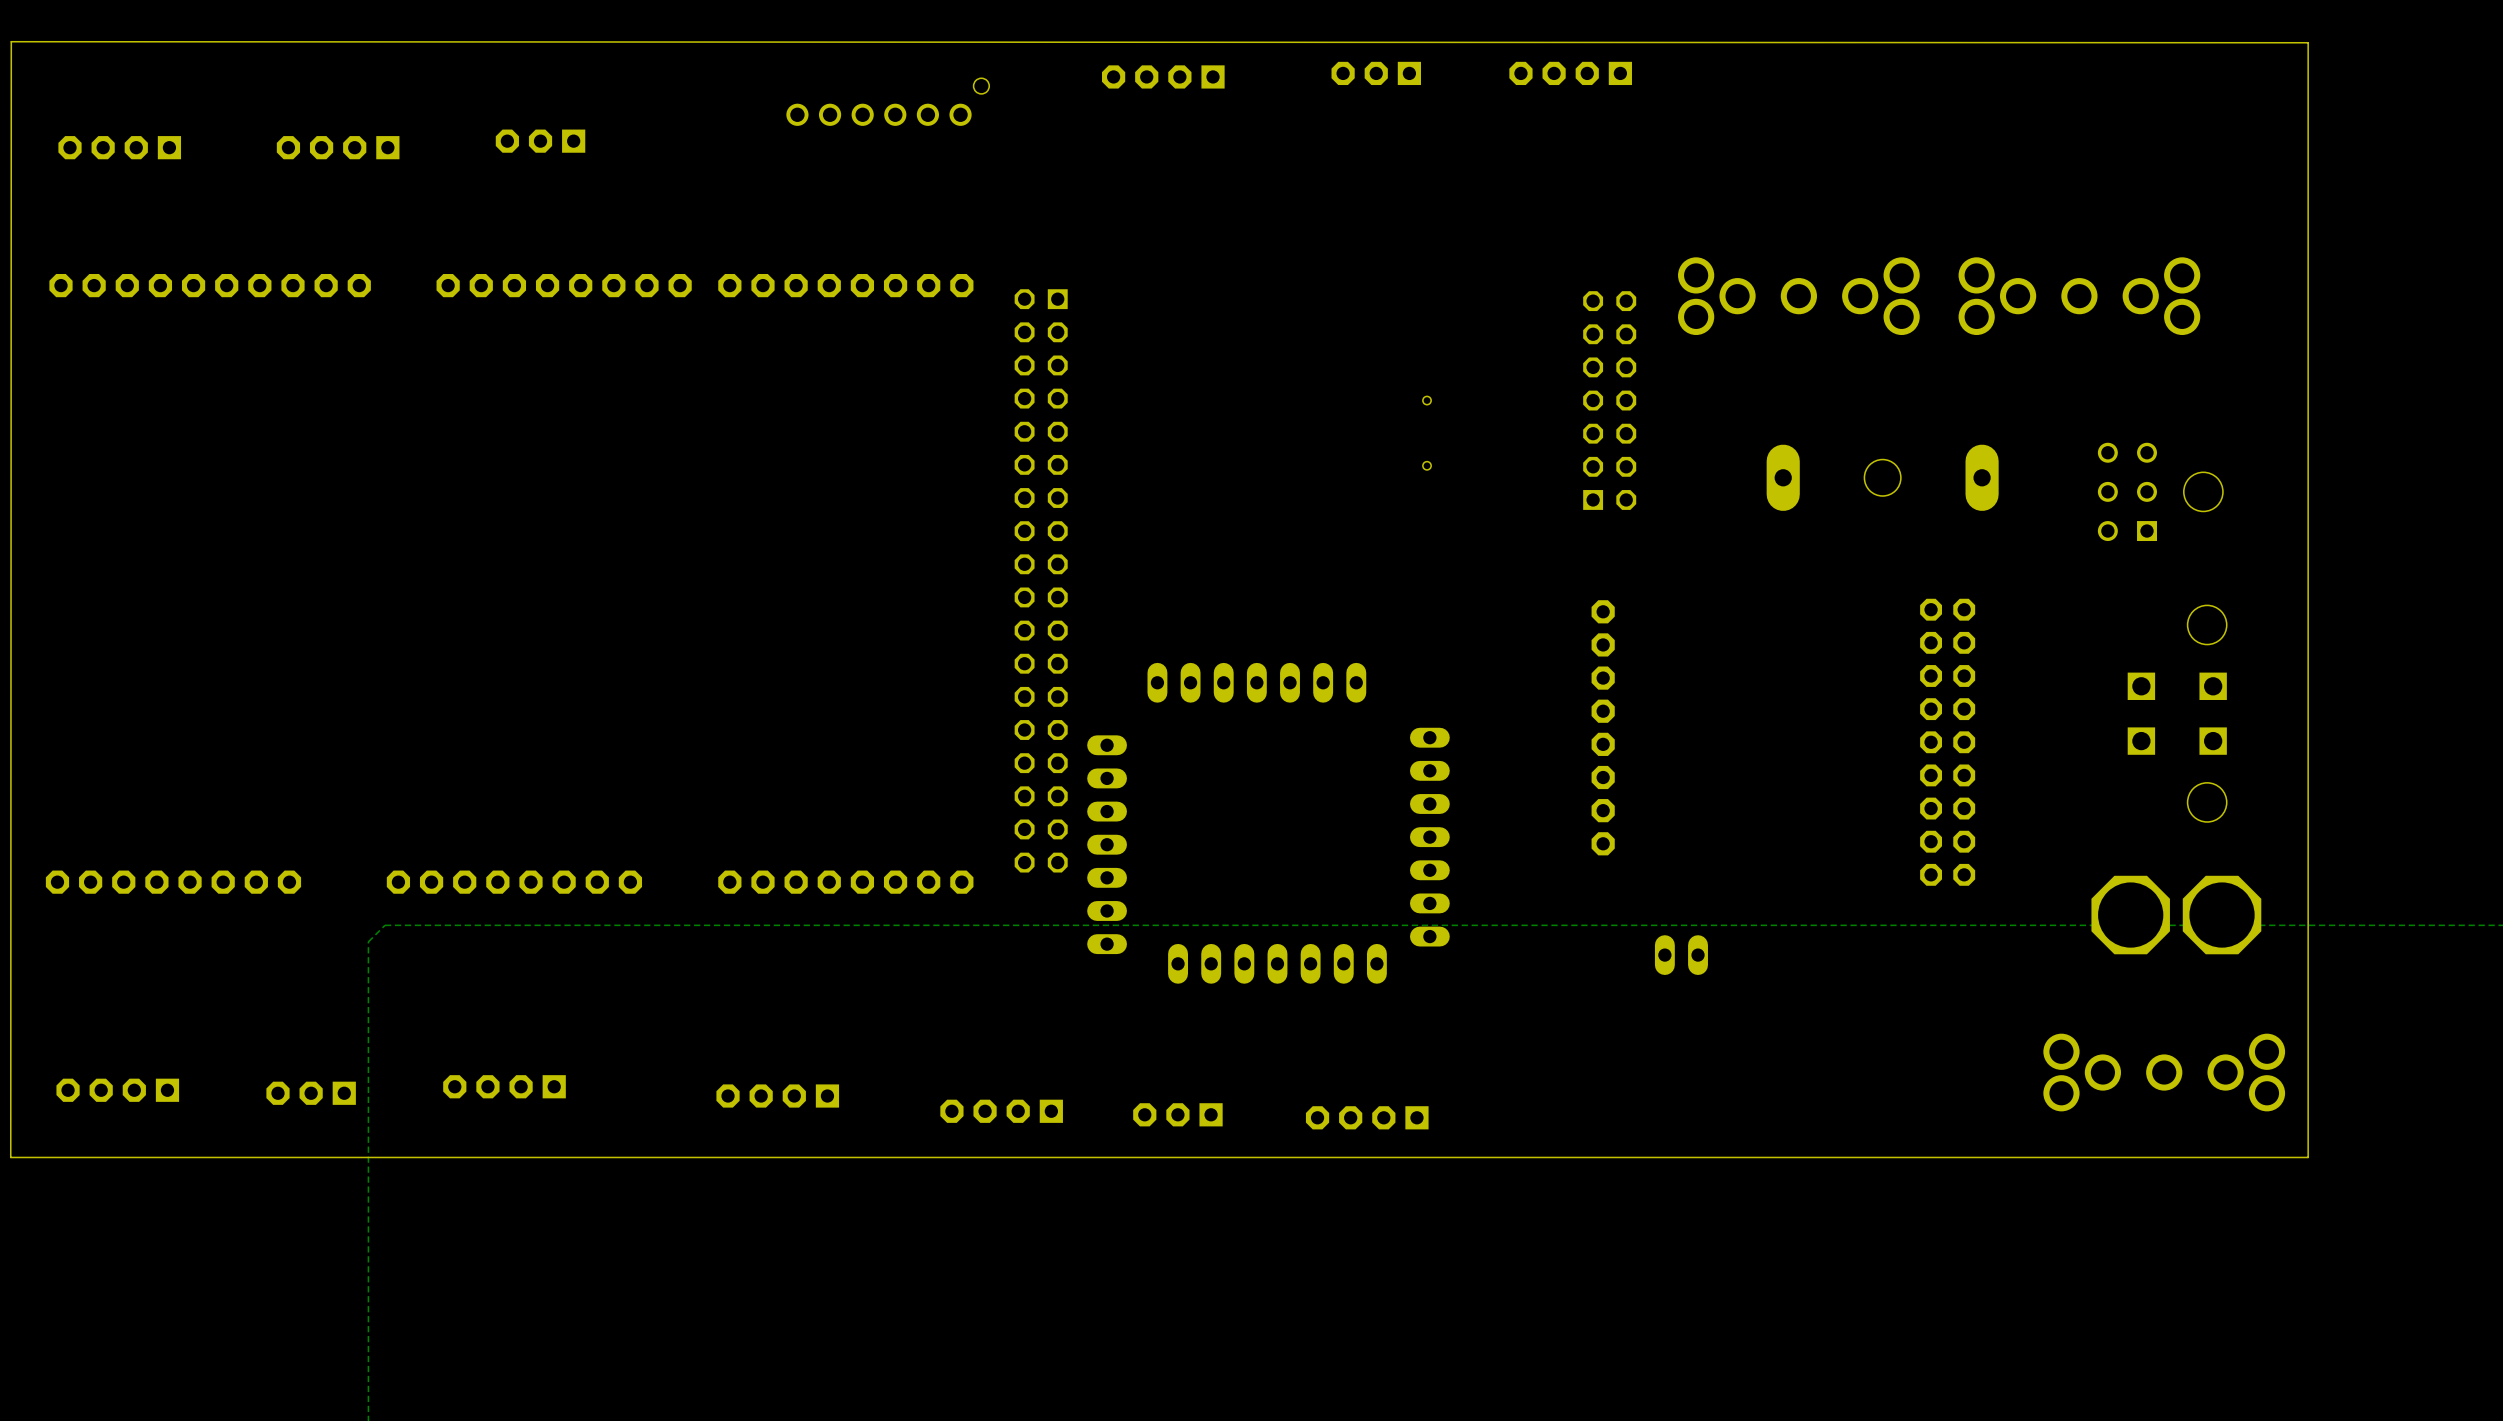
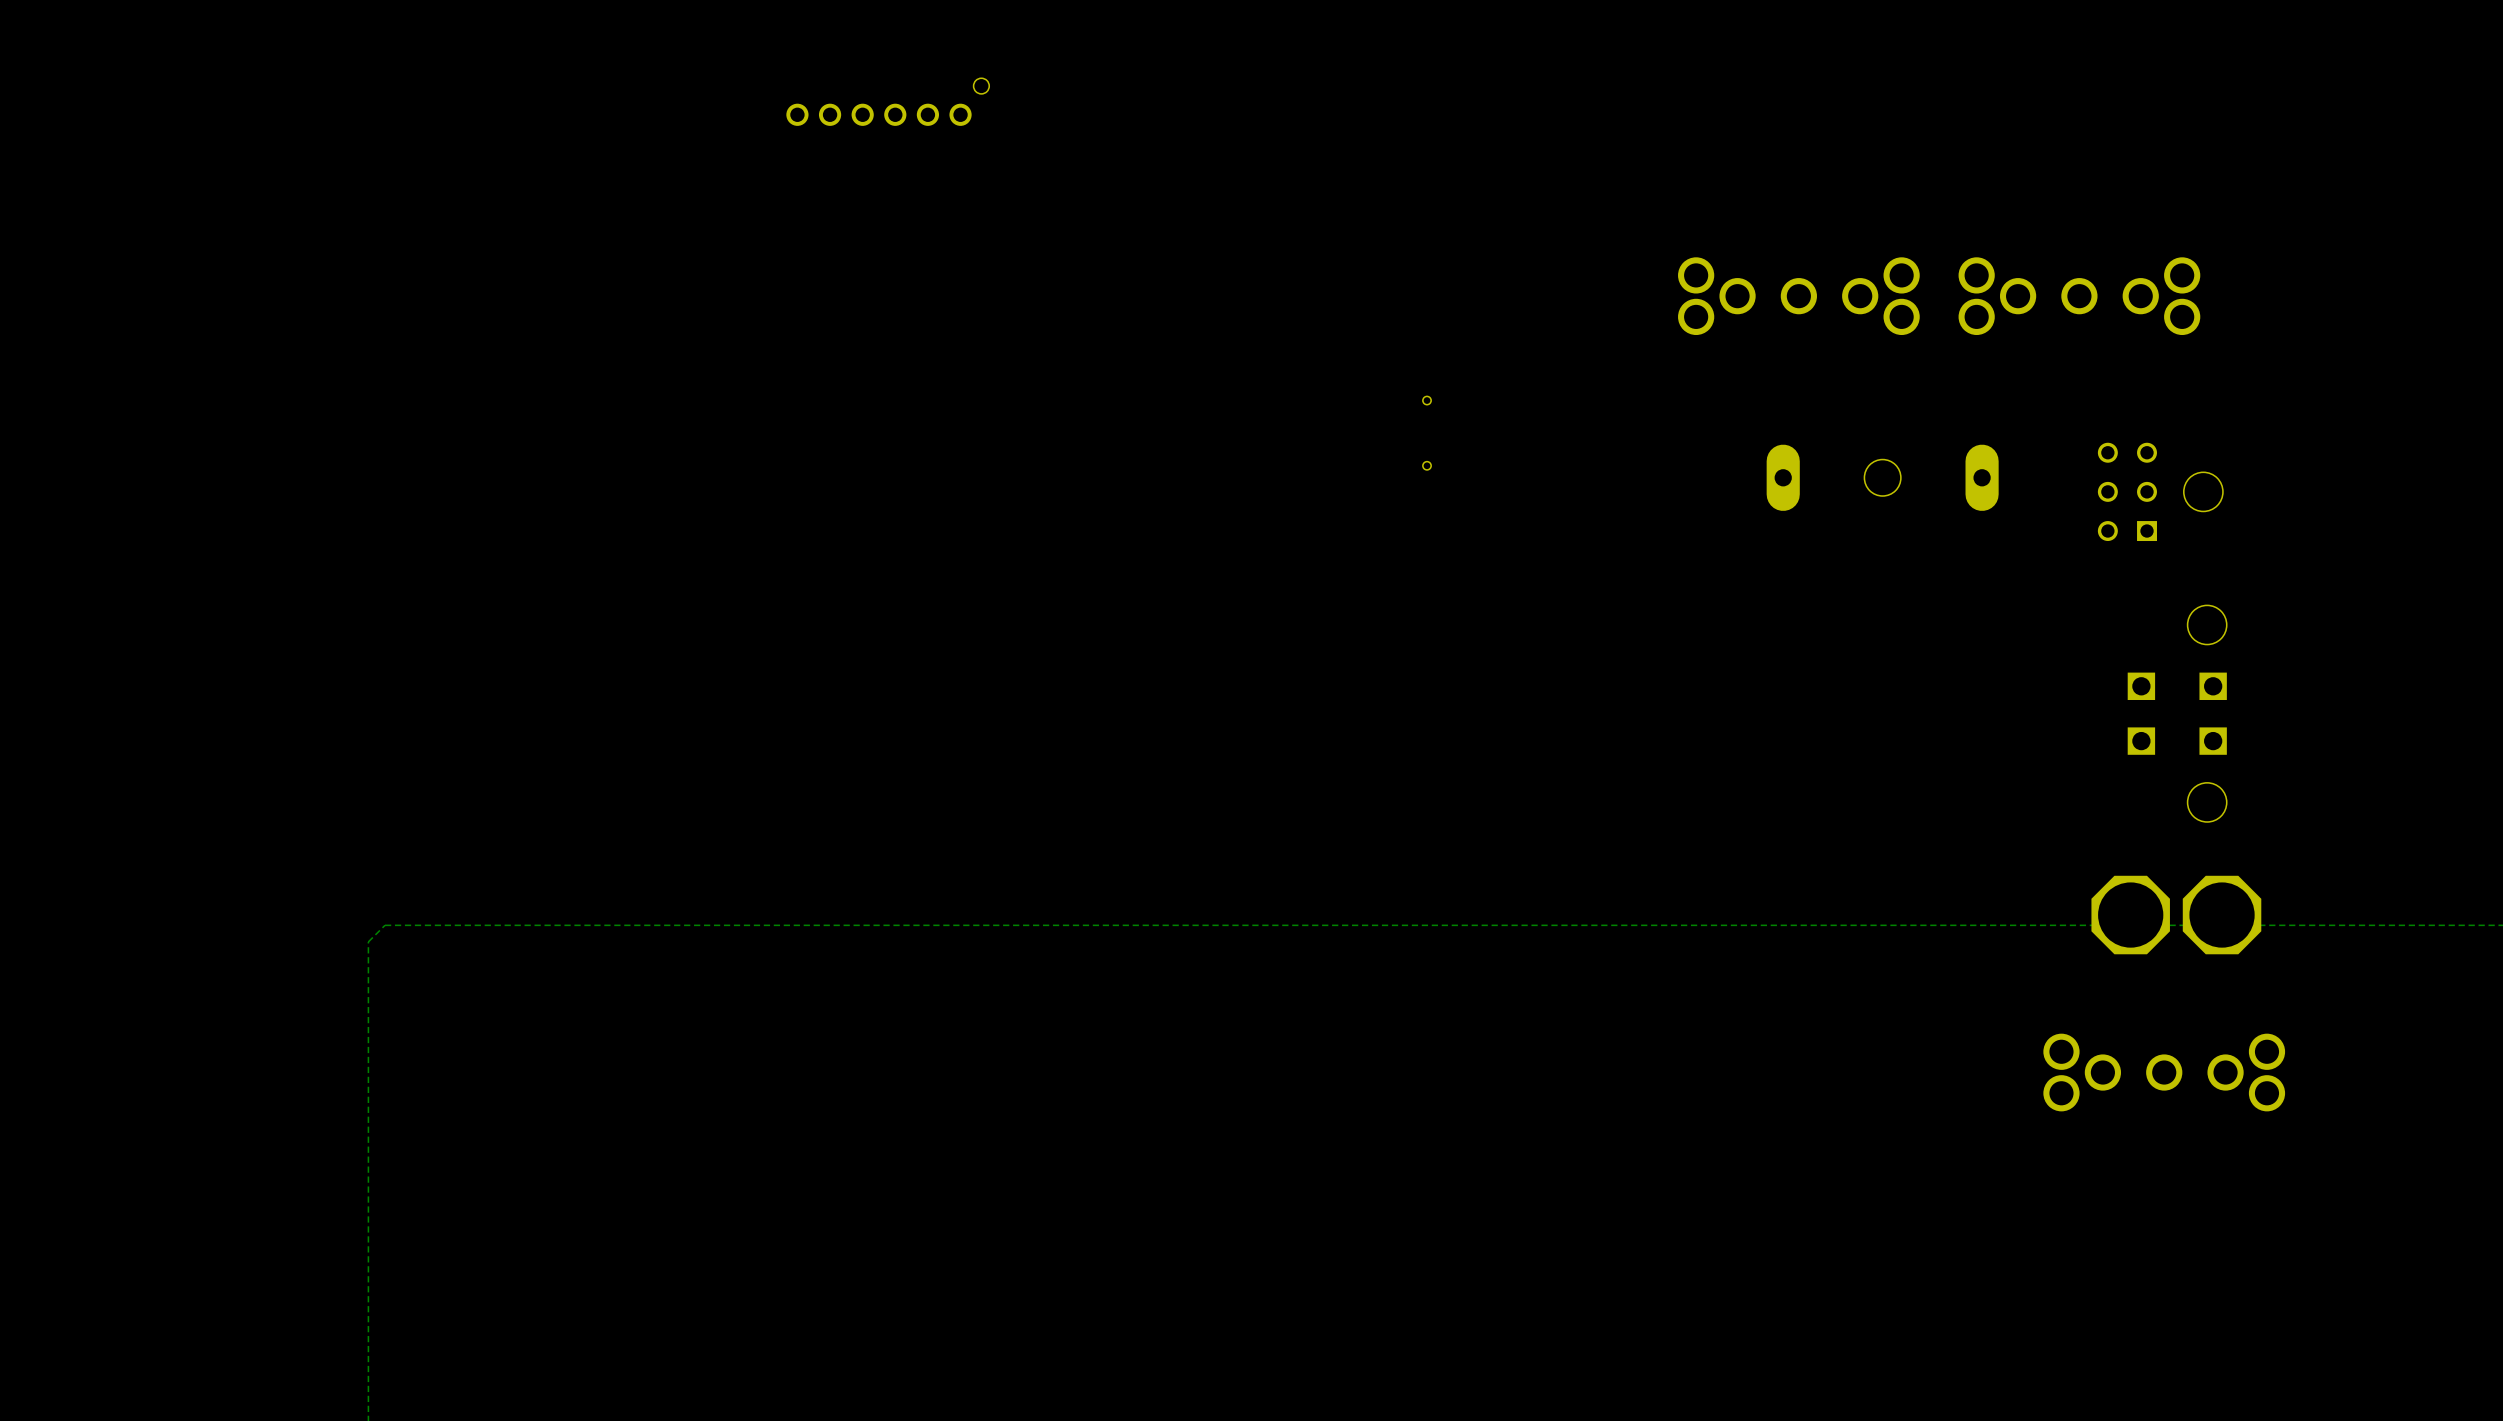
board edge: (11, 41) (2308, 42) (2308, 1157) (10, 1157) (11, 41) -> none
part: (1376, 73) -> none
part: (1570, 73) -> none
part: (1163, 76) -> none
part: (540, 141) -> none
part: (119, 147) -> none
part: (338, 147) -> none
part: (210, 285) -> none
part: (564, 285) -> none
part: (845, 285) -> none
part: (1609, 400) -> none
part: (1041, 580) -> none
part: (1256, 682) -> none
part: (1603, 727) -> none
part: (1947, 742) -> none
part: (1429, 837) -> none
part: (1107, 844) -> none
part: (173, 882) -> none
part: (514, 882) -> none
part: (845, 882) -> none
part: (1681, 955) -> none
part: (1277, 963) -> none
part: (504, 1086) -> none
part: (117, 1090) -> none
part: (311, 1093) -> none
part: (777, 1096) -> none
part: (1001, 1111) -> none
part: (1177, 1114) -> none
part: (1367, 1117) -> none

